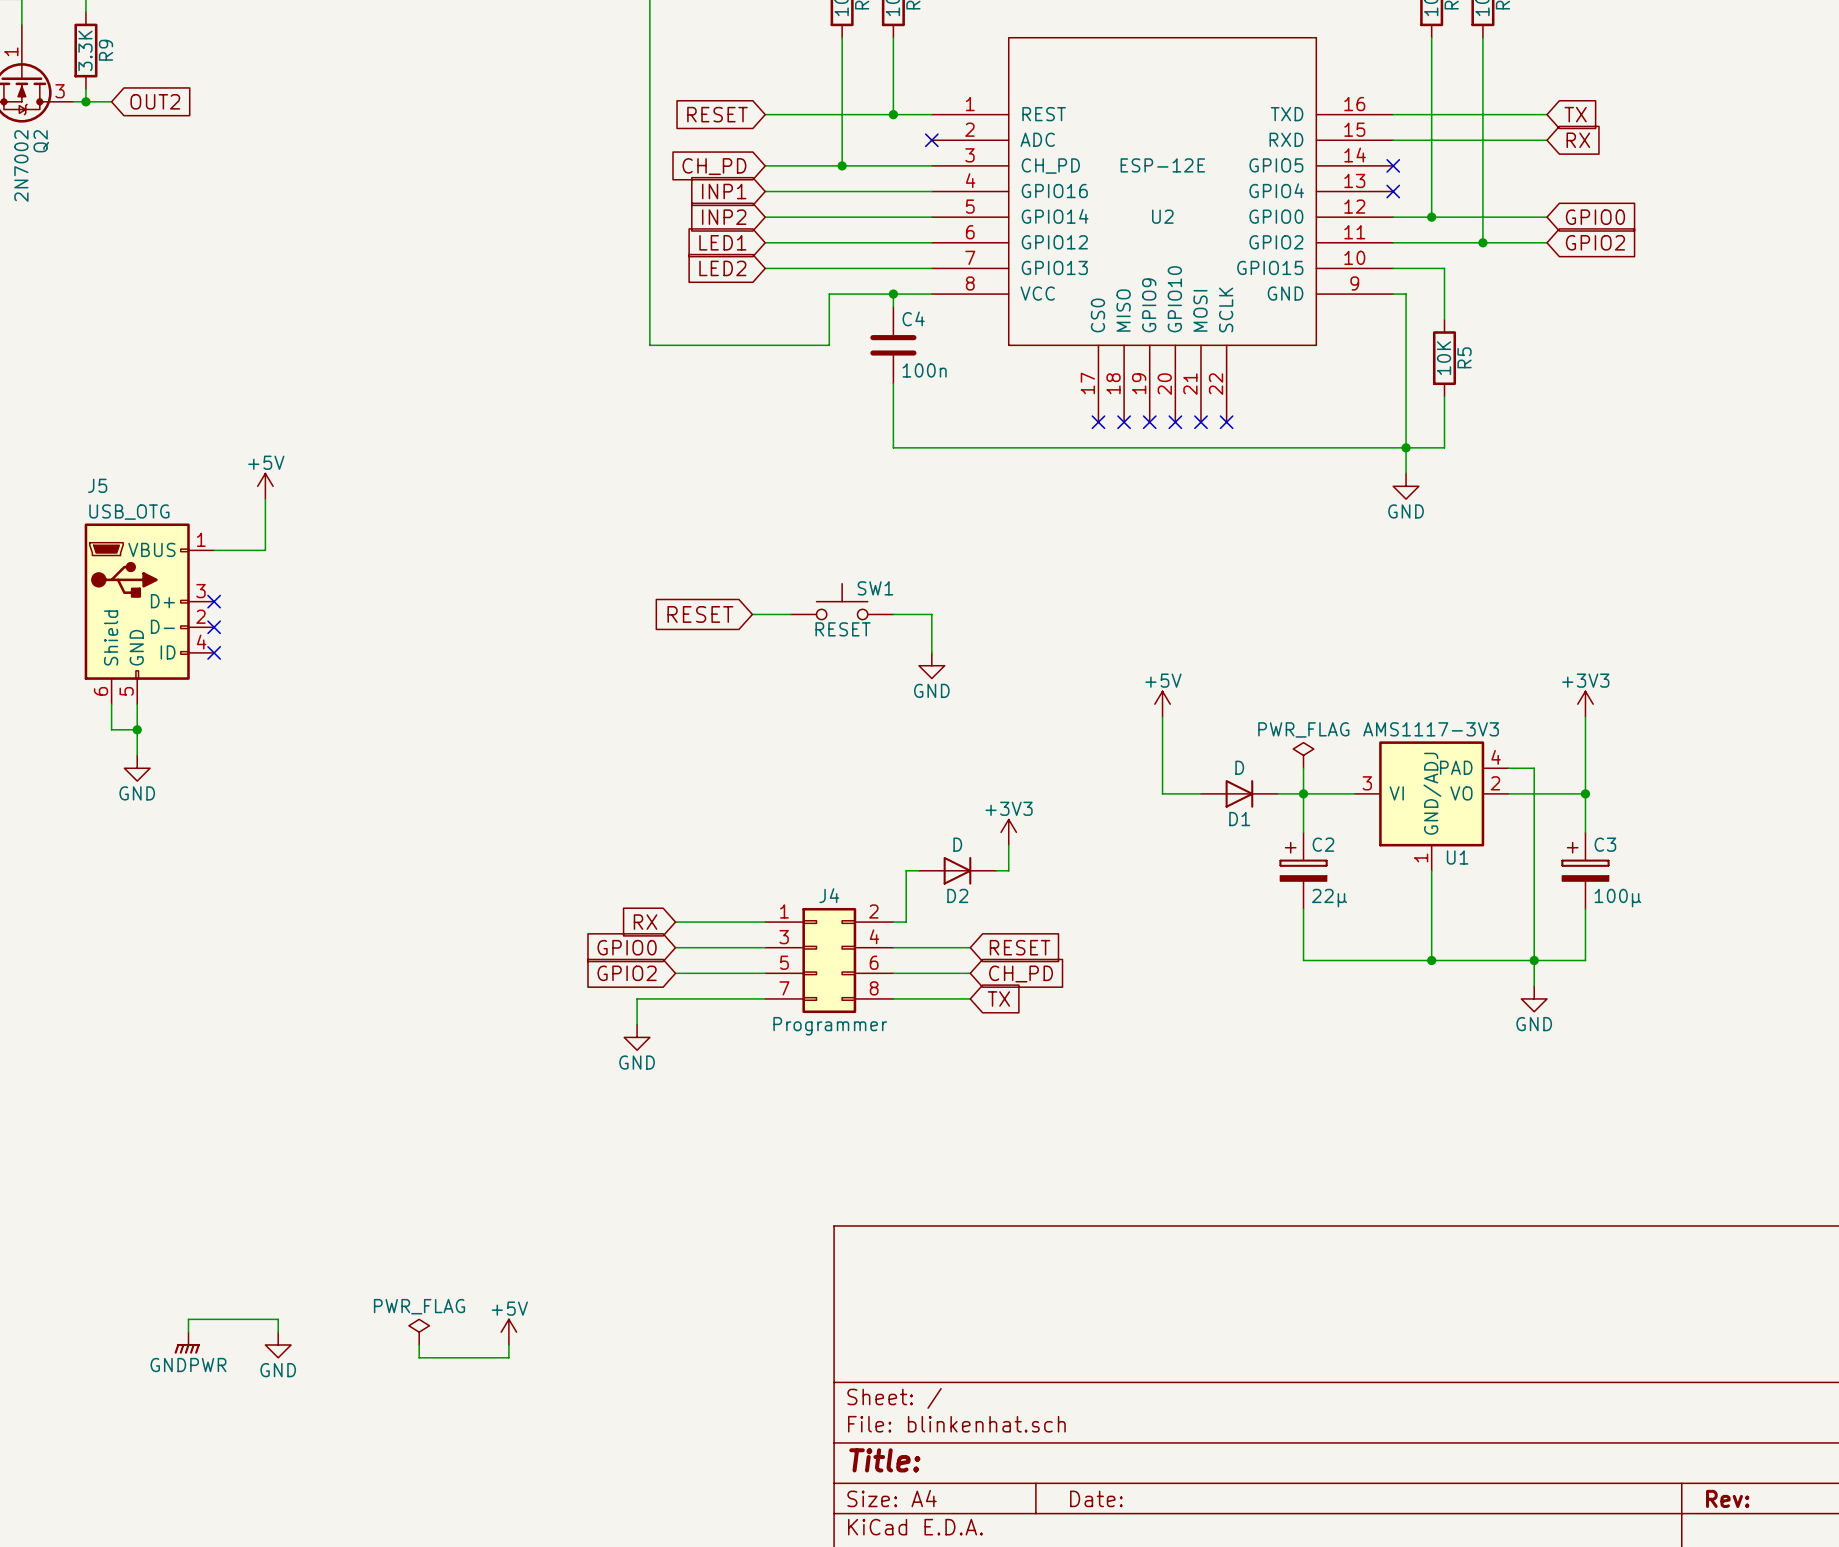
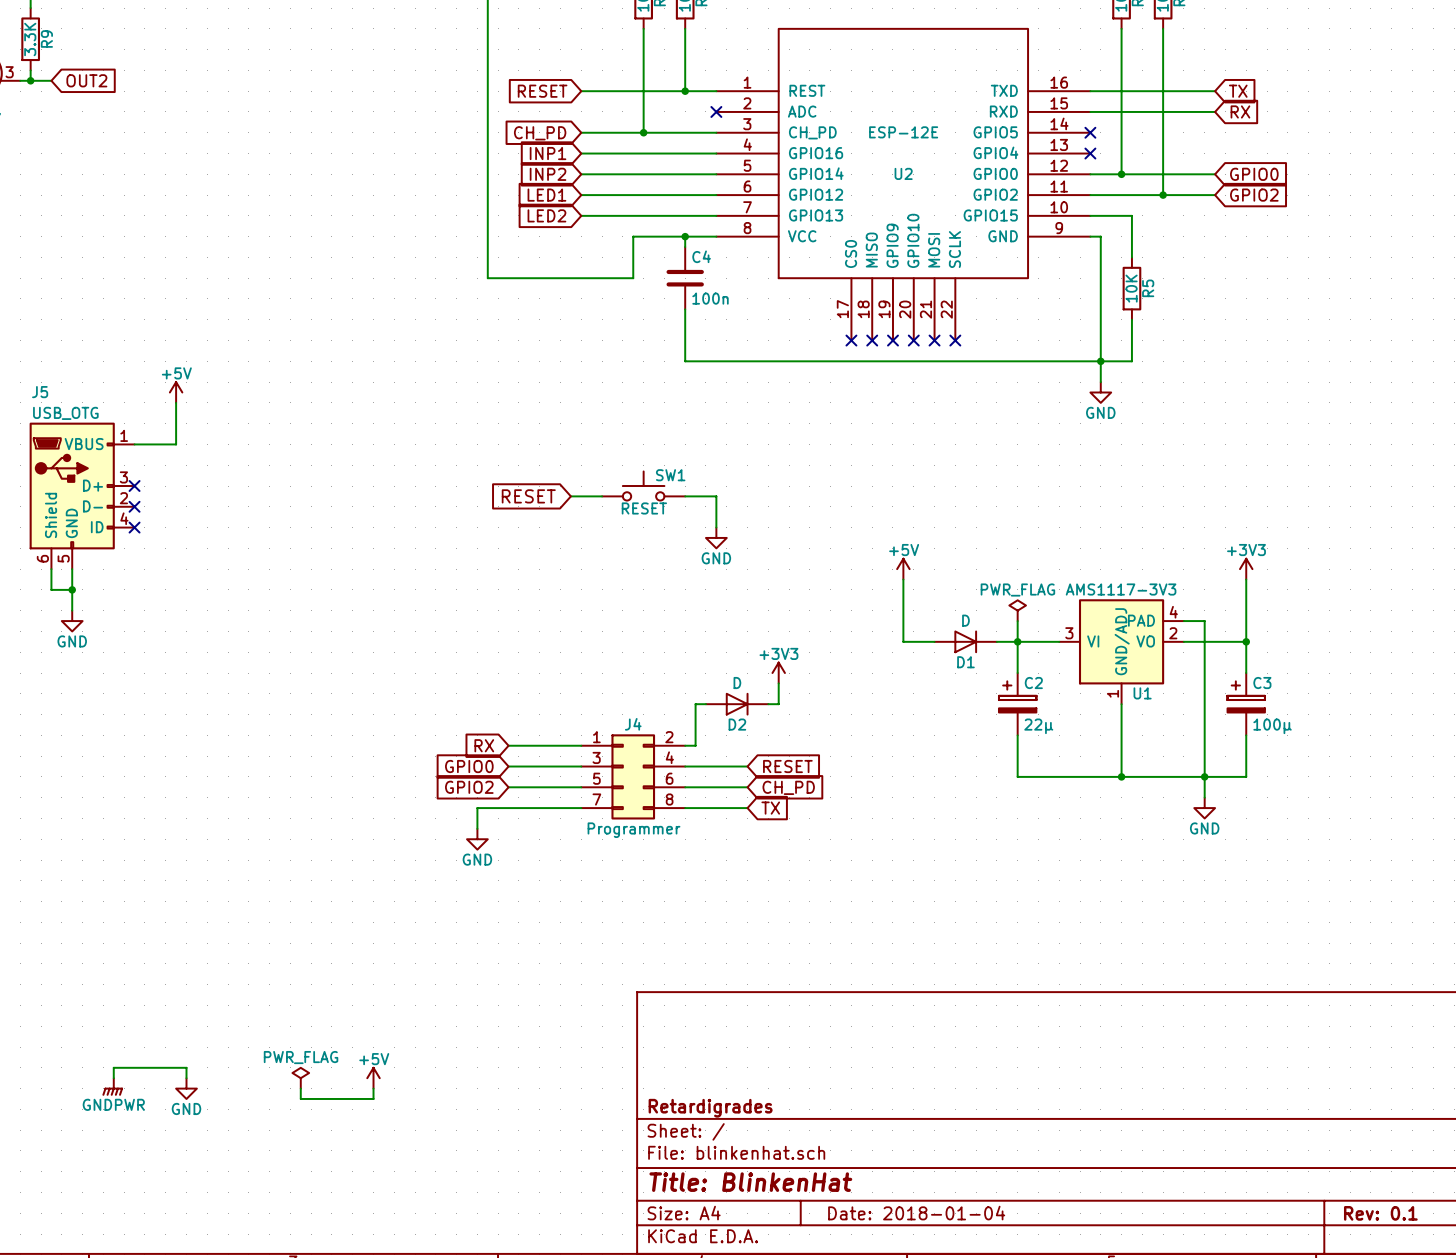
title block: none -> Retardigrades (710, 1108)
title block: Title: (884, 1460) -> Title: BlinkenHat (750, 1182)
title block: Date: (1096, 1498) -> Date: 2018-01-04 (916, 1213)
title block: Rev: (1727, 1498) -> Rev: 0.1 (1380, 1213)

